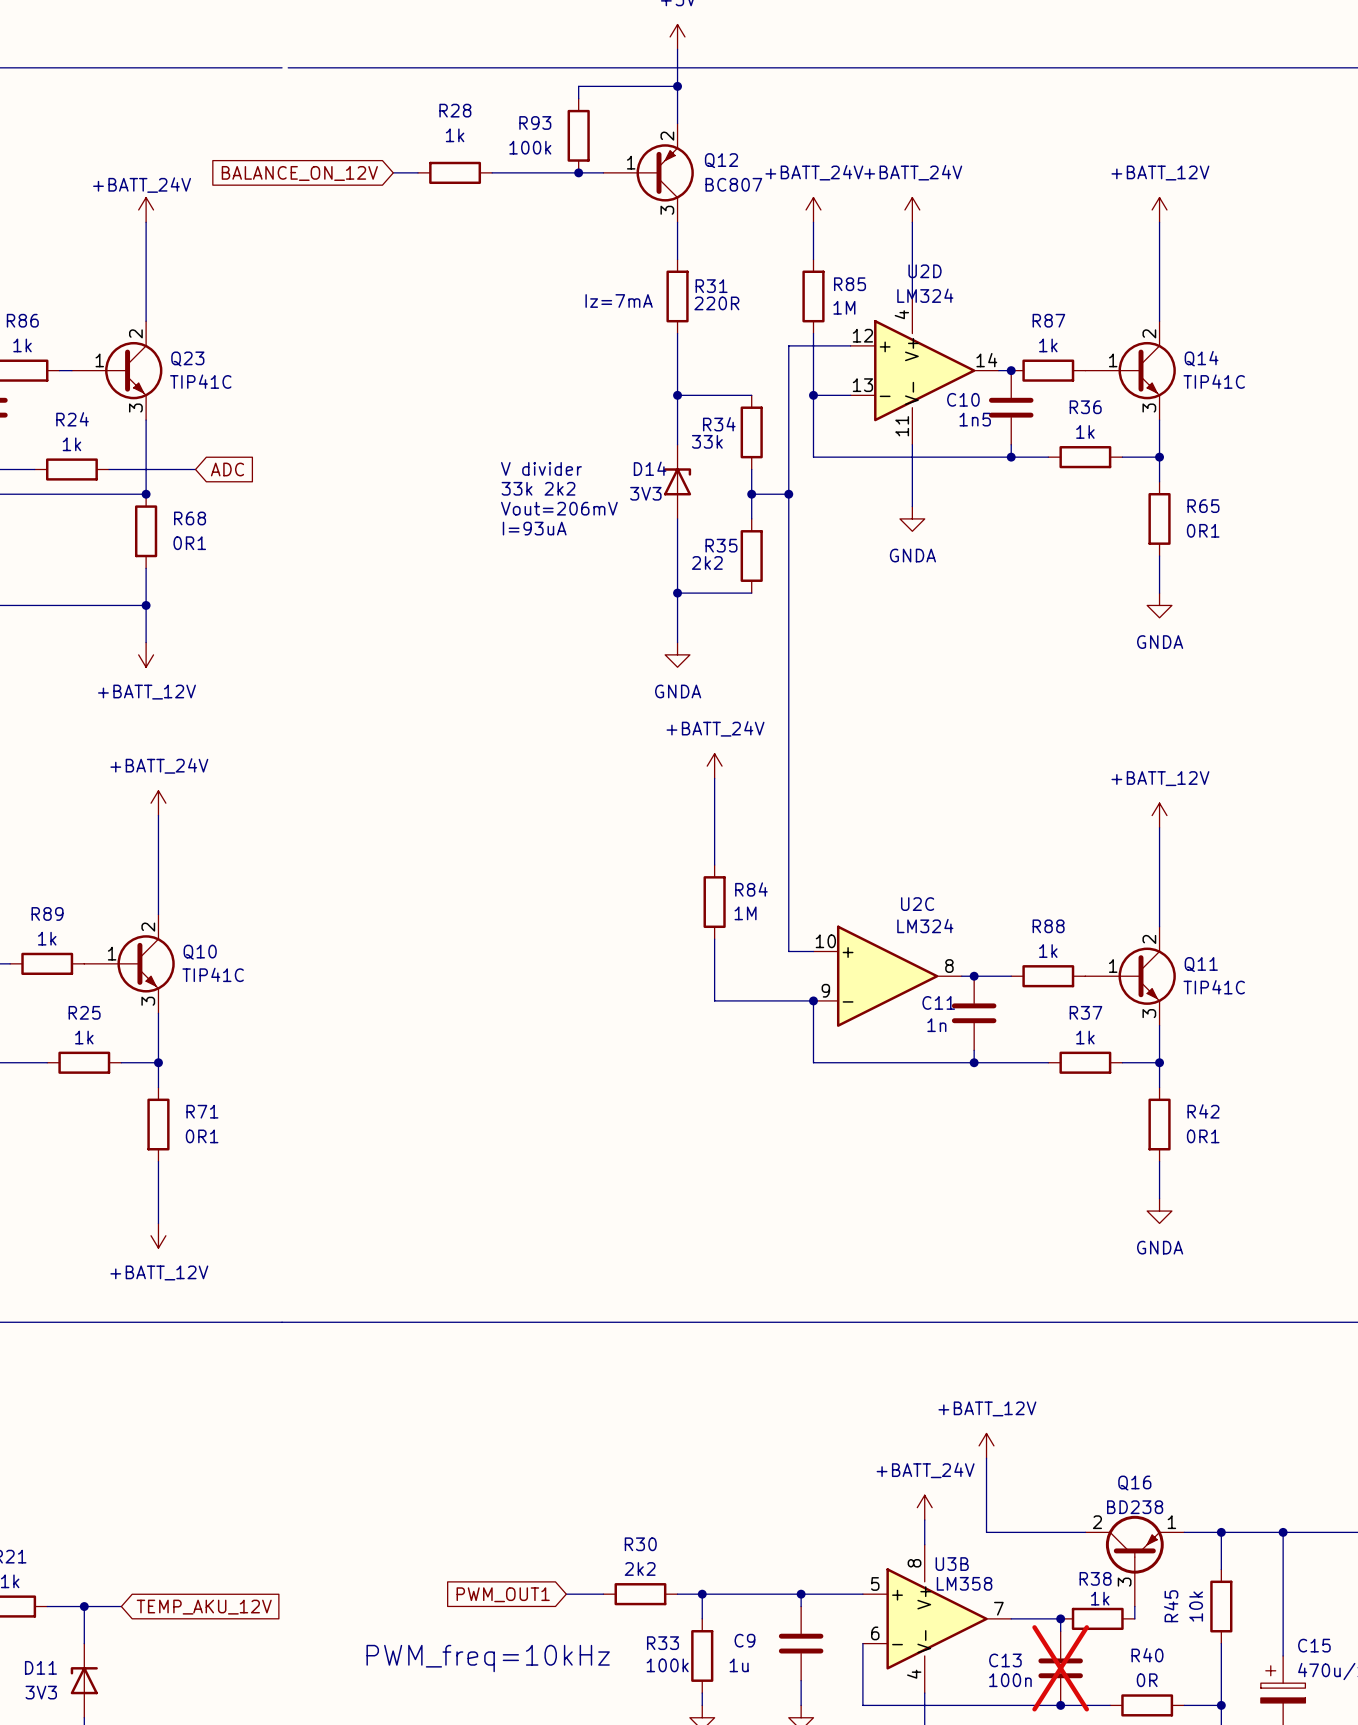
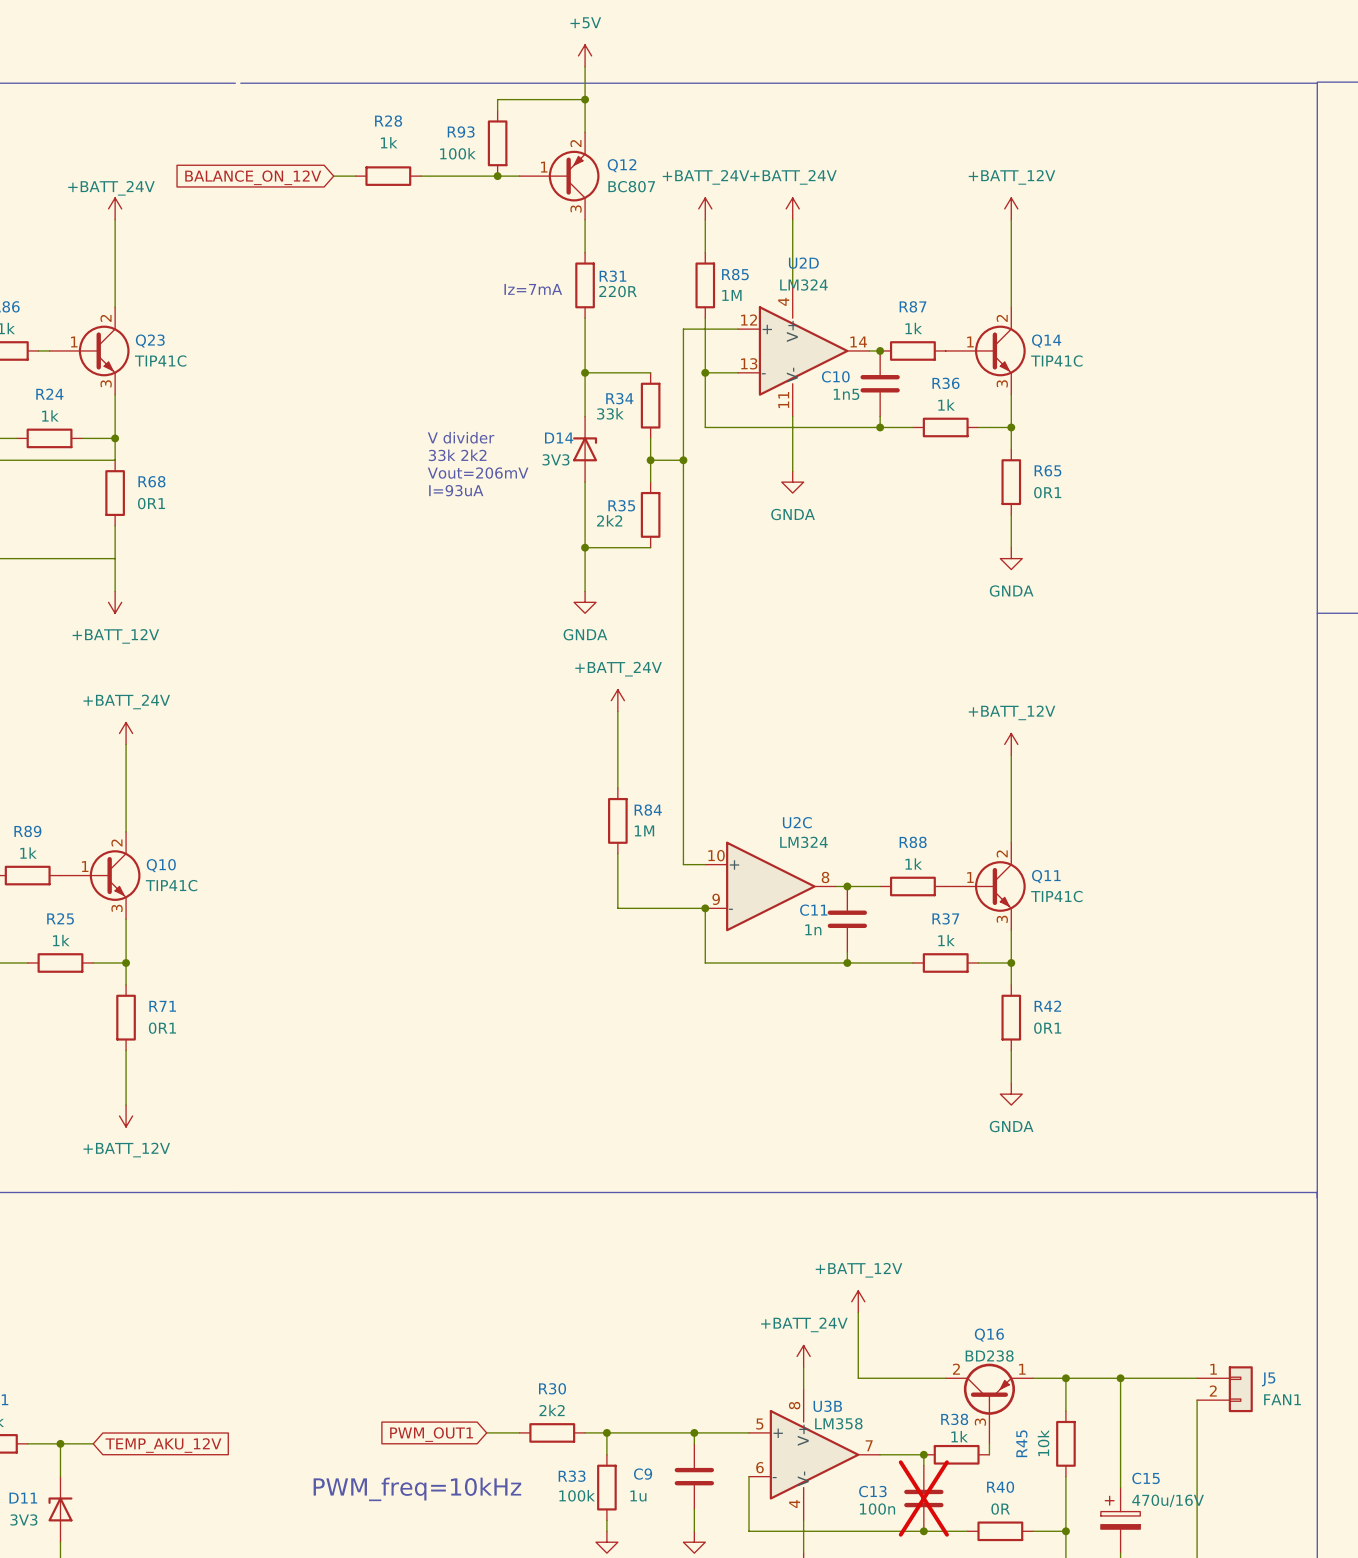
wire: (146, 469) (195, 469) -> none
global label: ADC (227, 469) -> none
junction position: (146, 494) -> (115, 438)
junction: (146, 605) -> none

